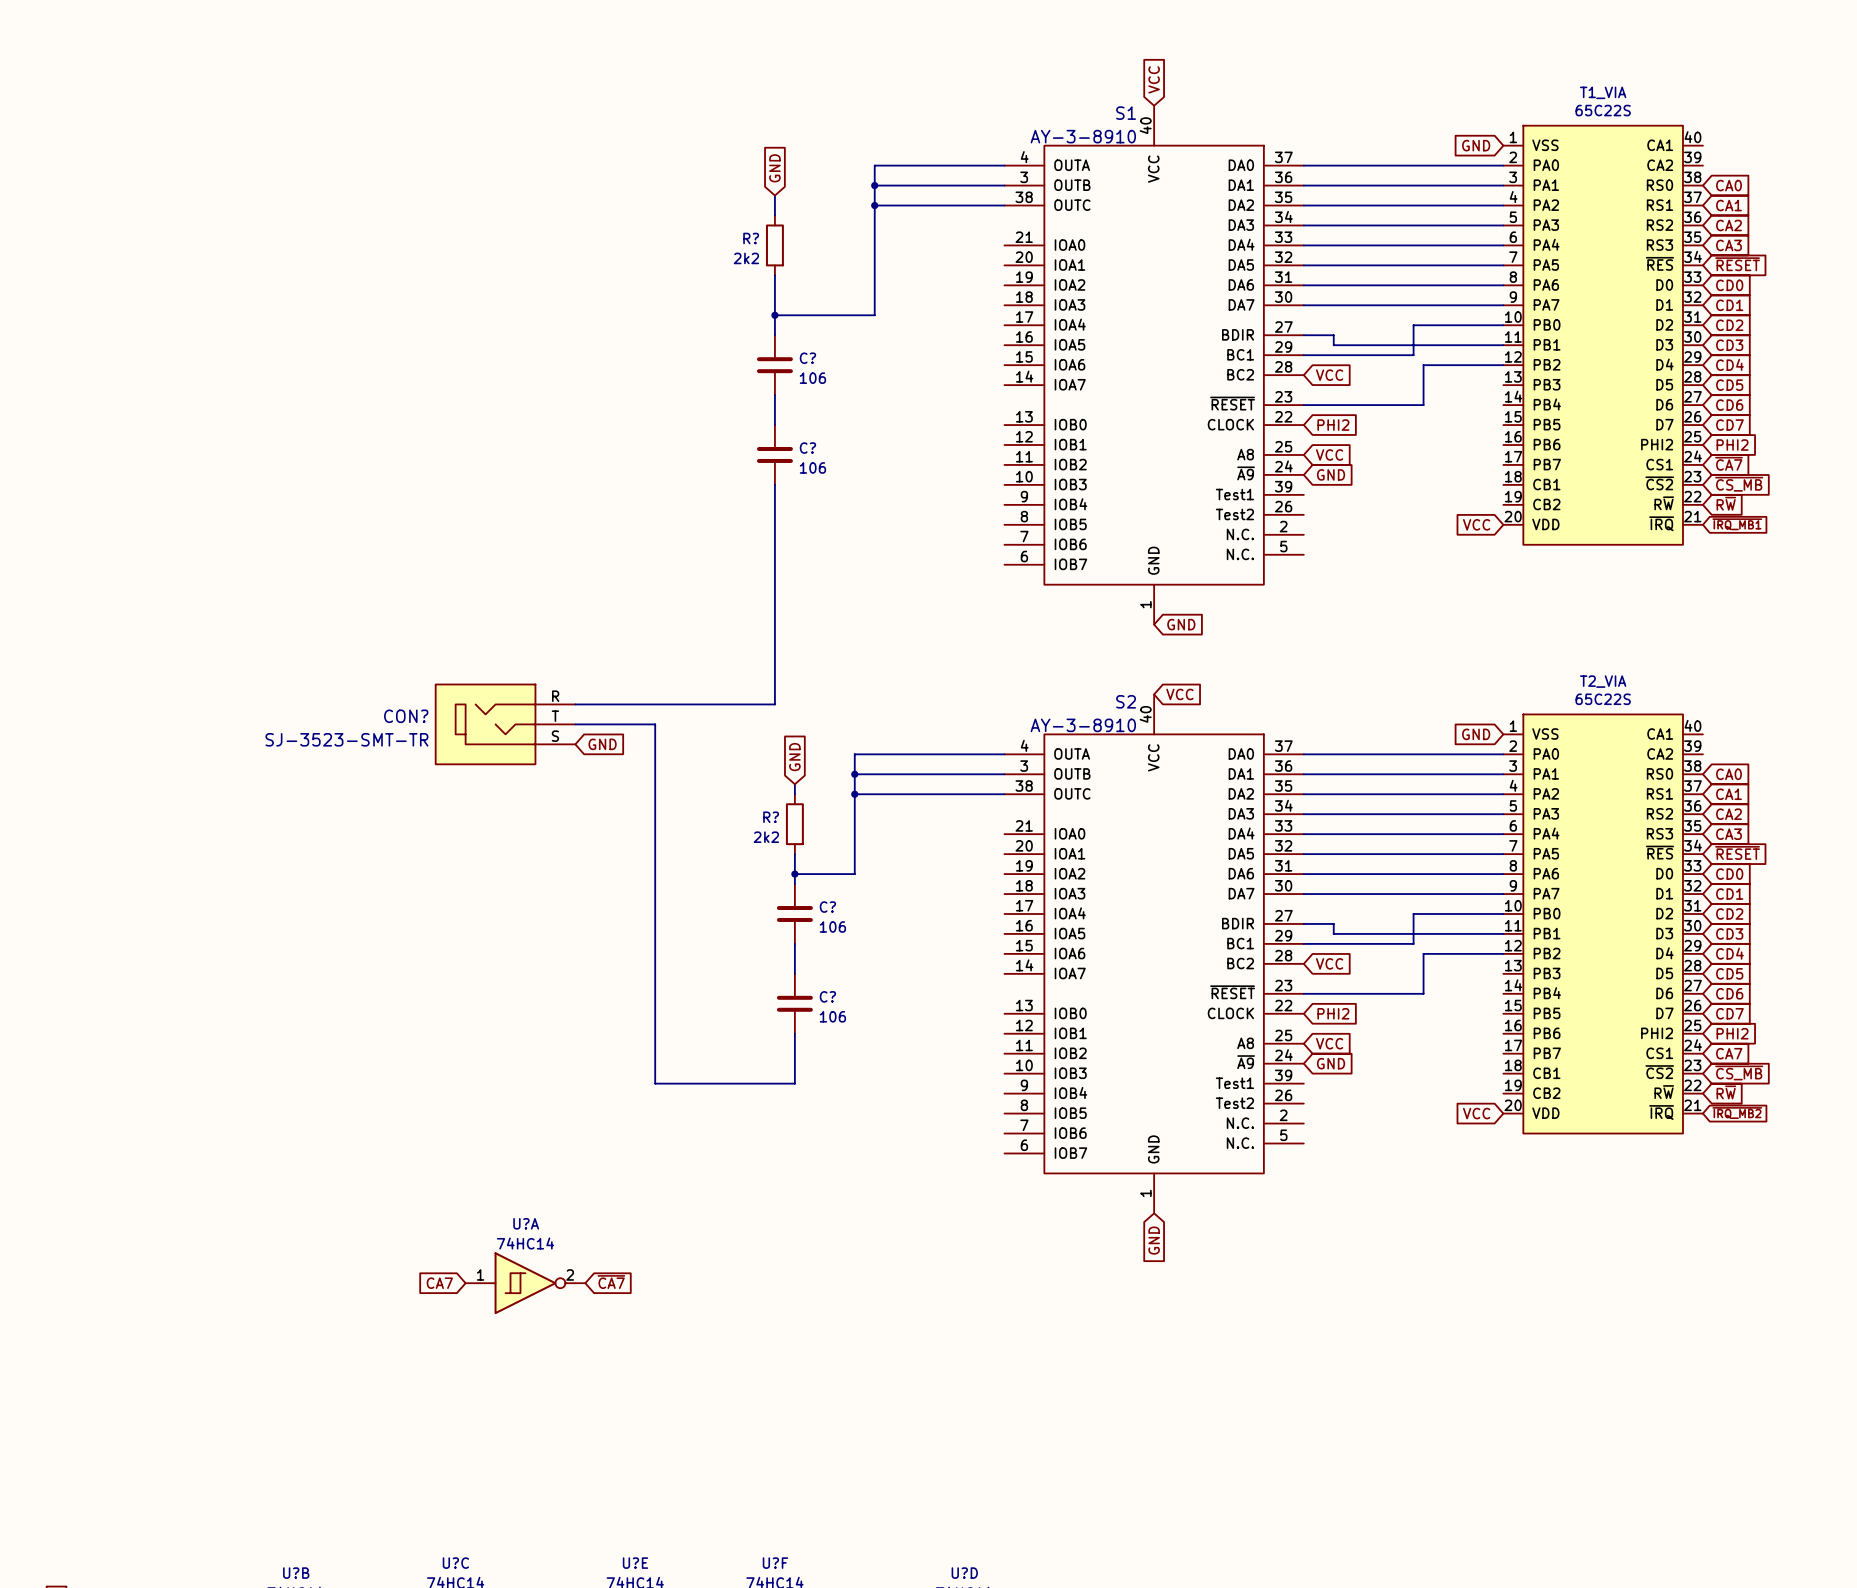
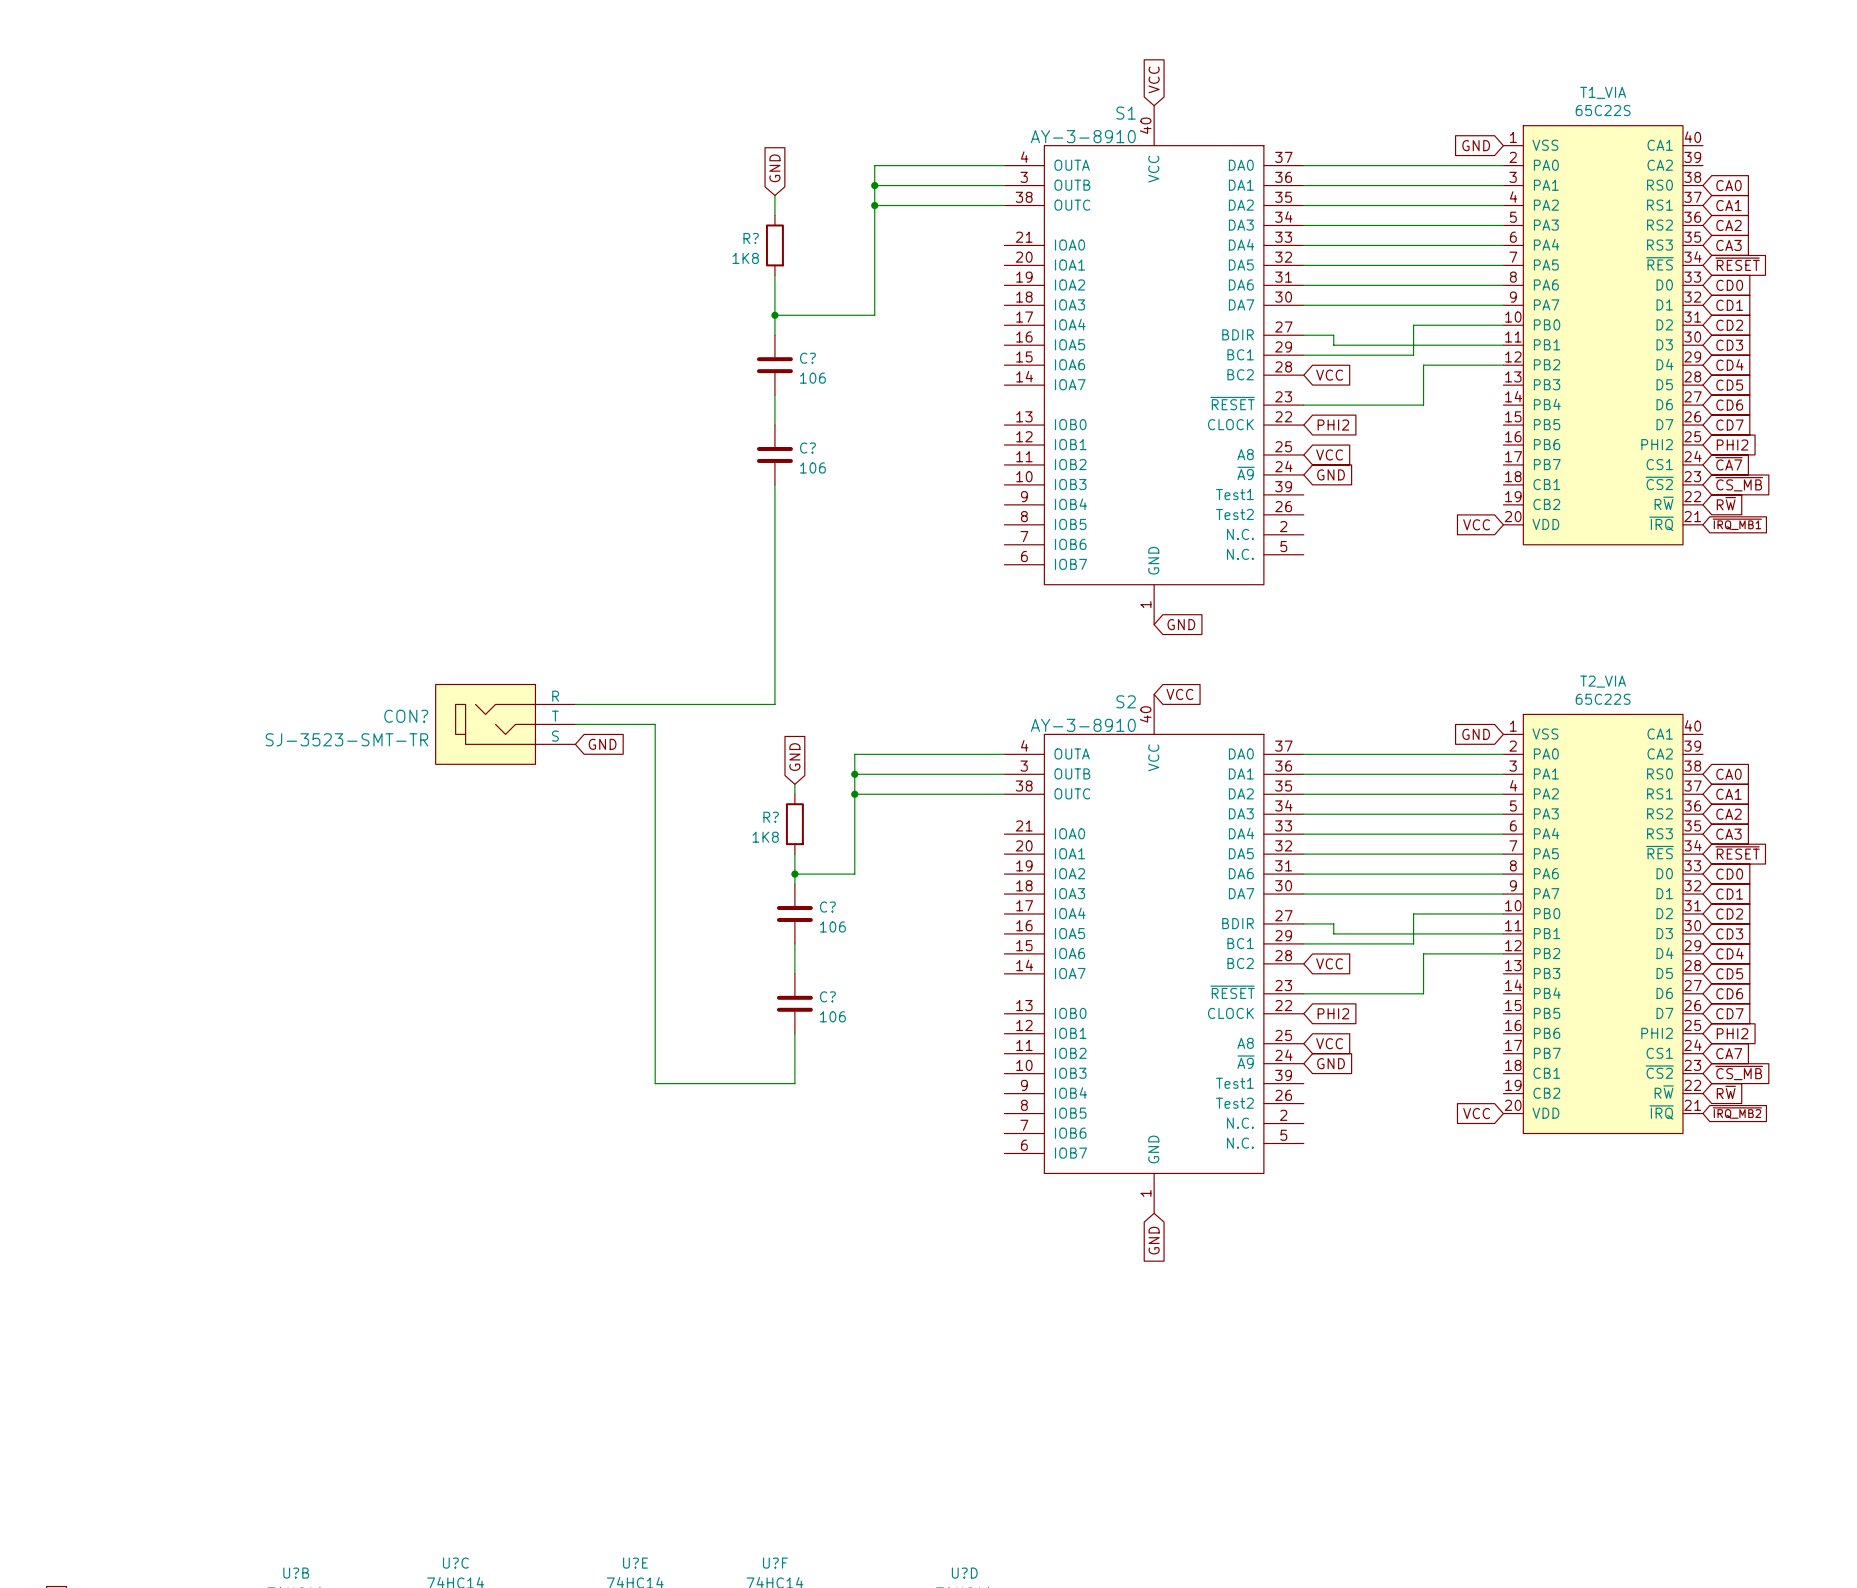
R? value: 2k2 (746, 258) -> 1K8 (745, 258)
R? value: 2k2 (766, 837) -> 1K8 (765, 837)
global label: ~{CA7} (611, 1282) -> none
global label: CA7 (439, 1283) -> none
U?A: 74HC14 (525, 1283) -> none

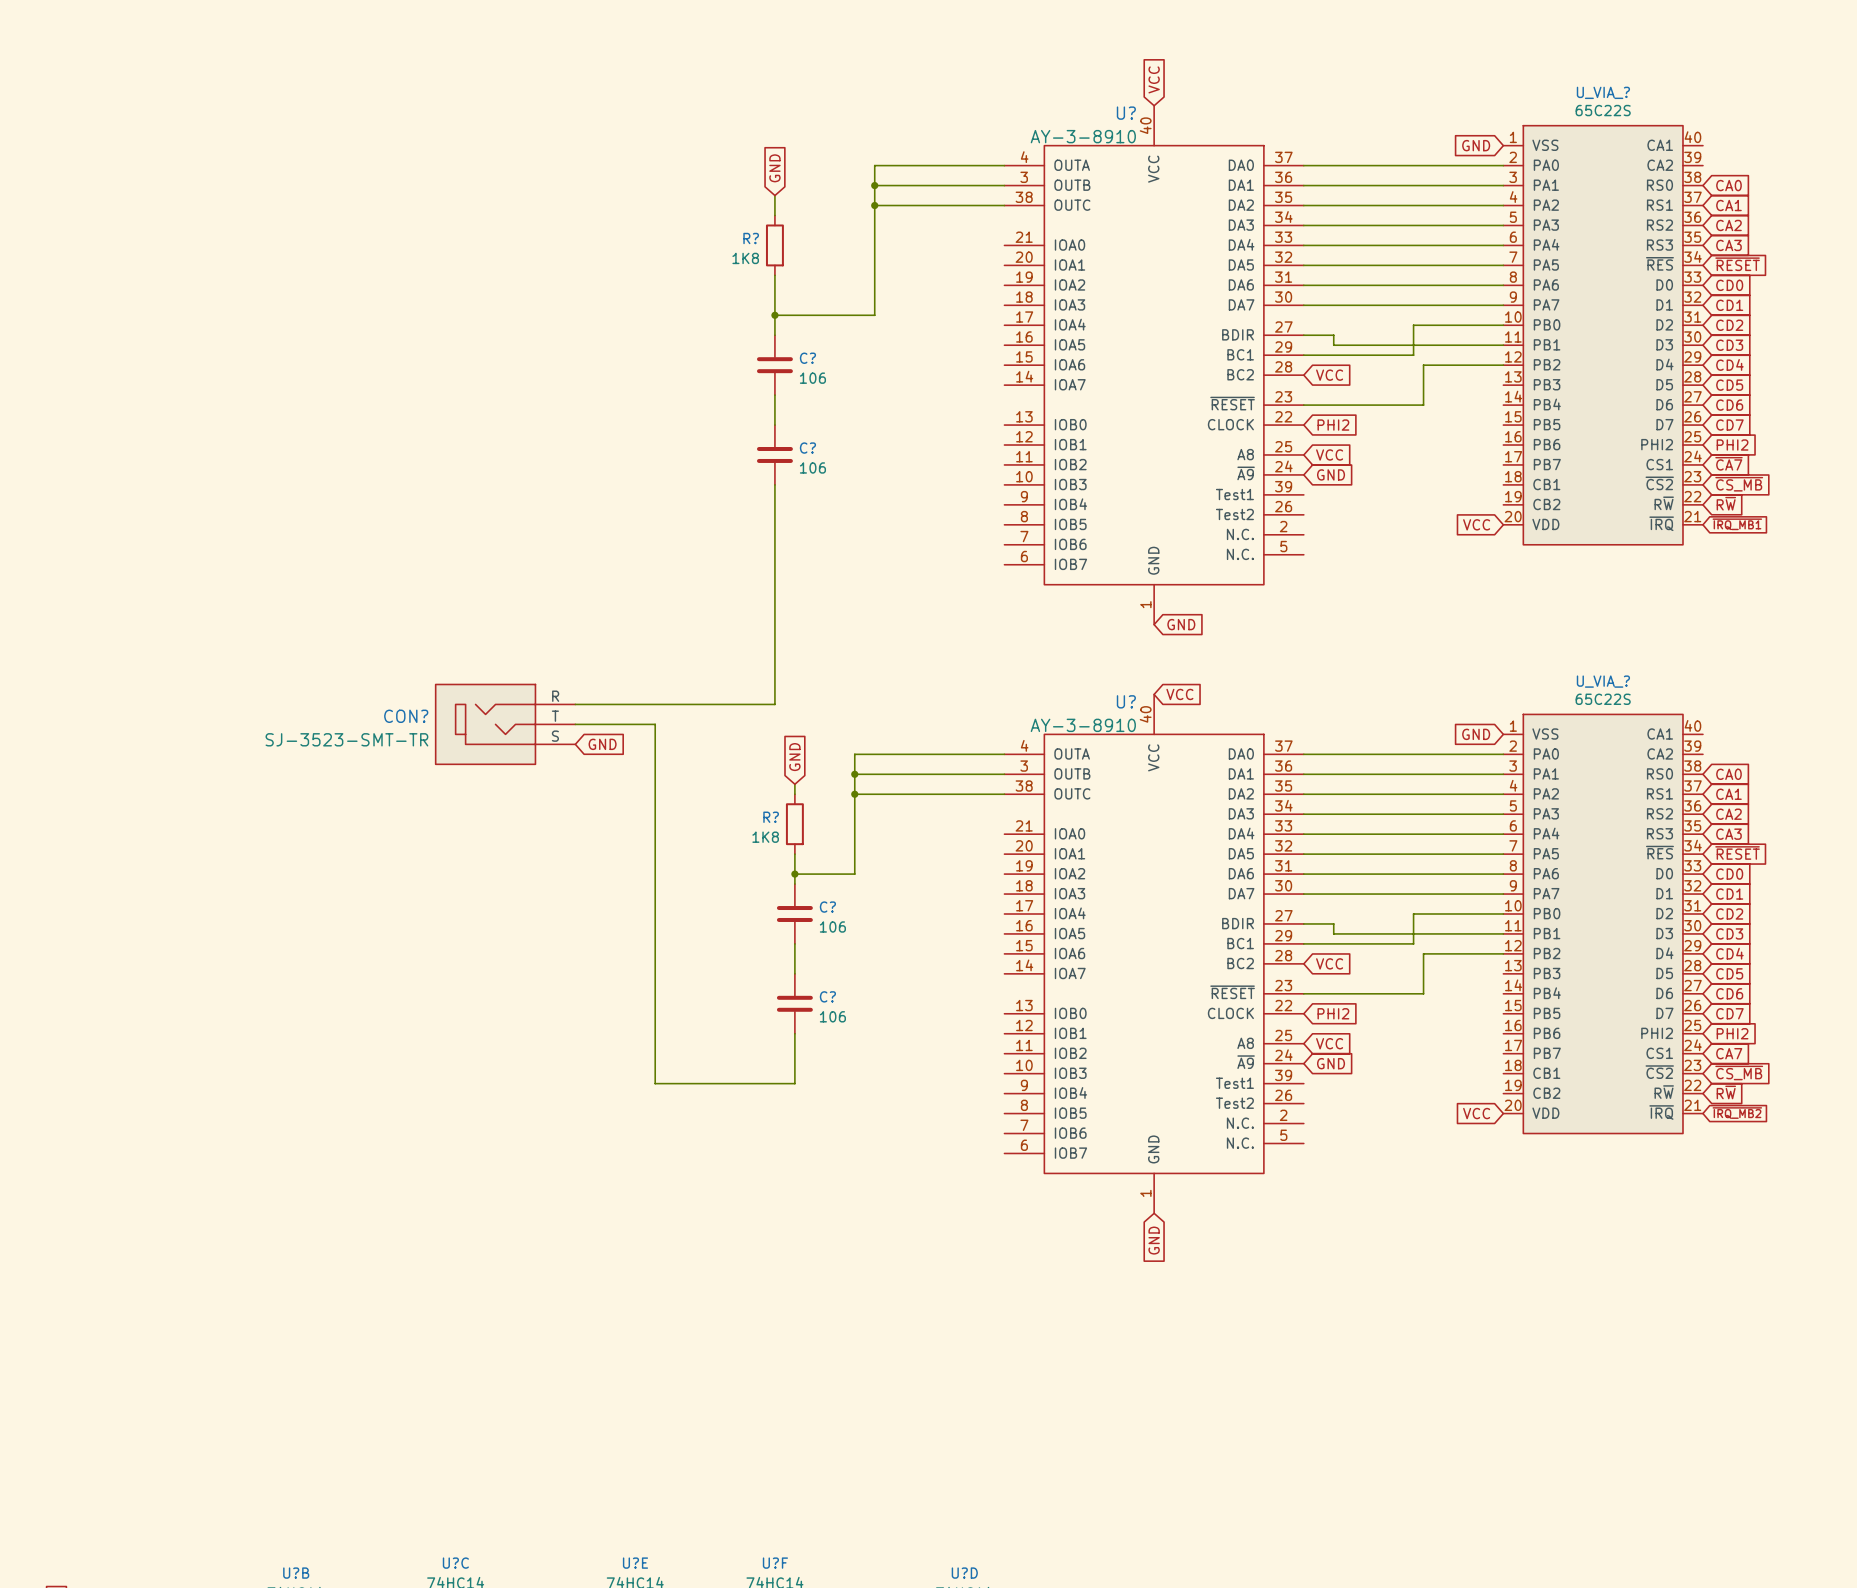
T1_VIA name: T1_VIA (1603, 92) -> U_VIA_? (1603, 92)
S1 name: S1 (1126, 113) -> U? (1126, 113)
T2_VIA name: T2_VIA (1603, 681) -> U_VIA_? (1603, 681)
S2 name: S2 (1126, 701) -> U? (1126, 701)

